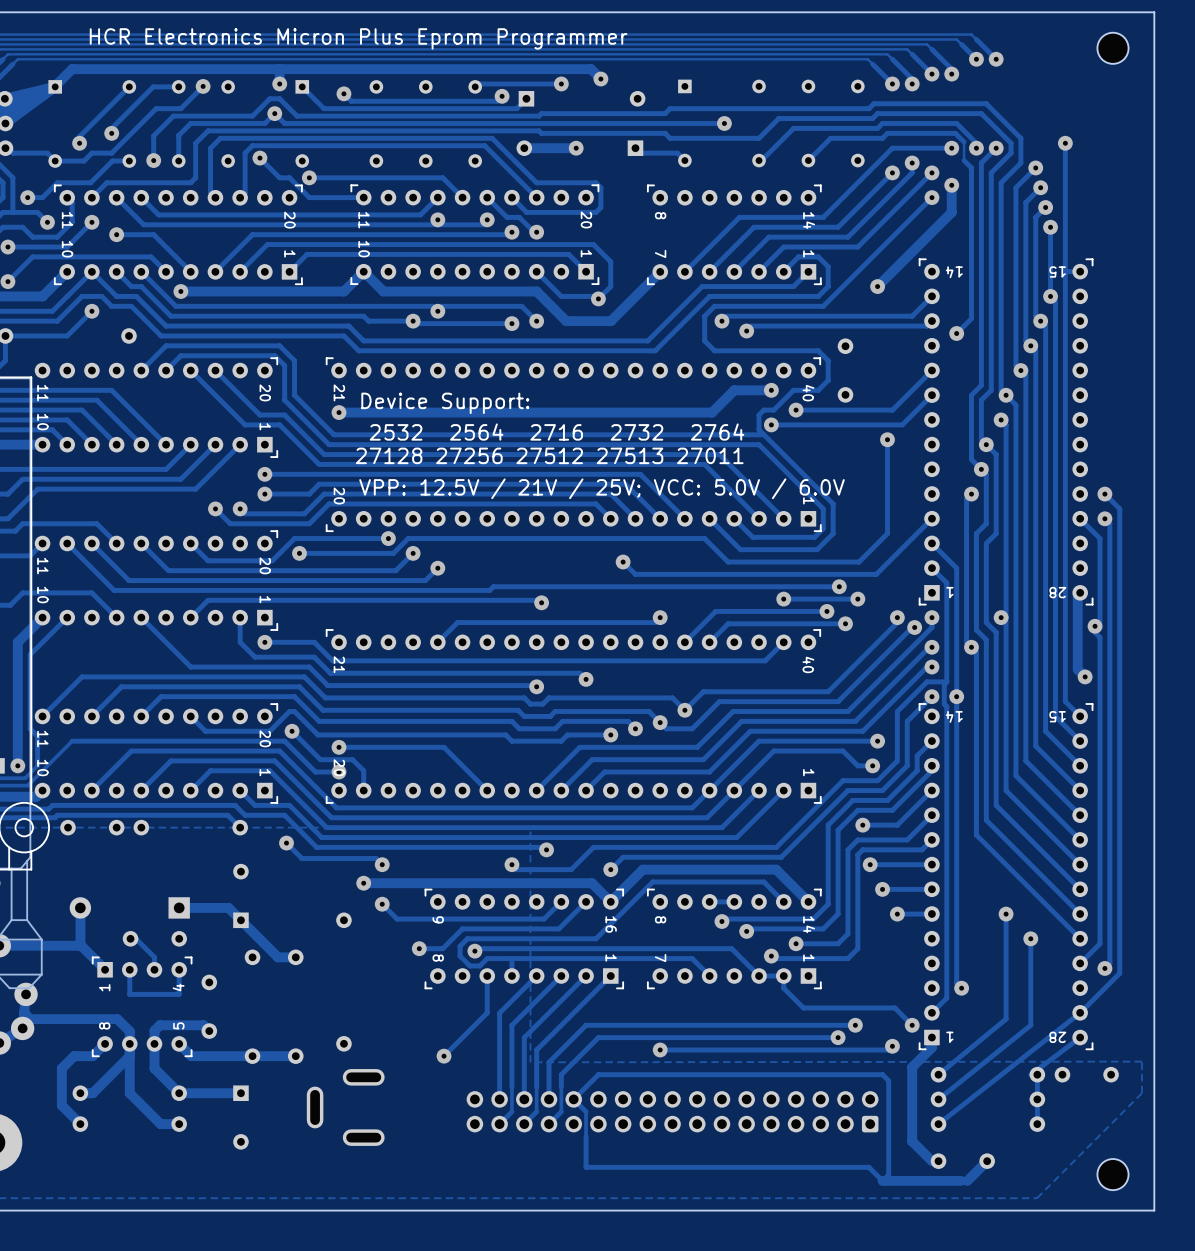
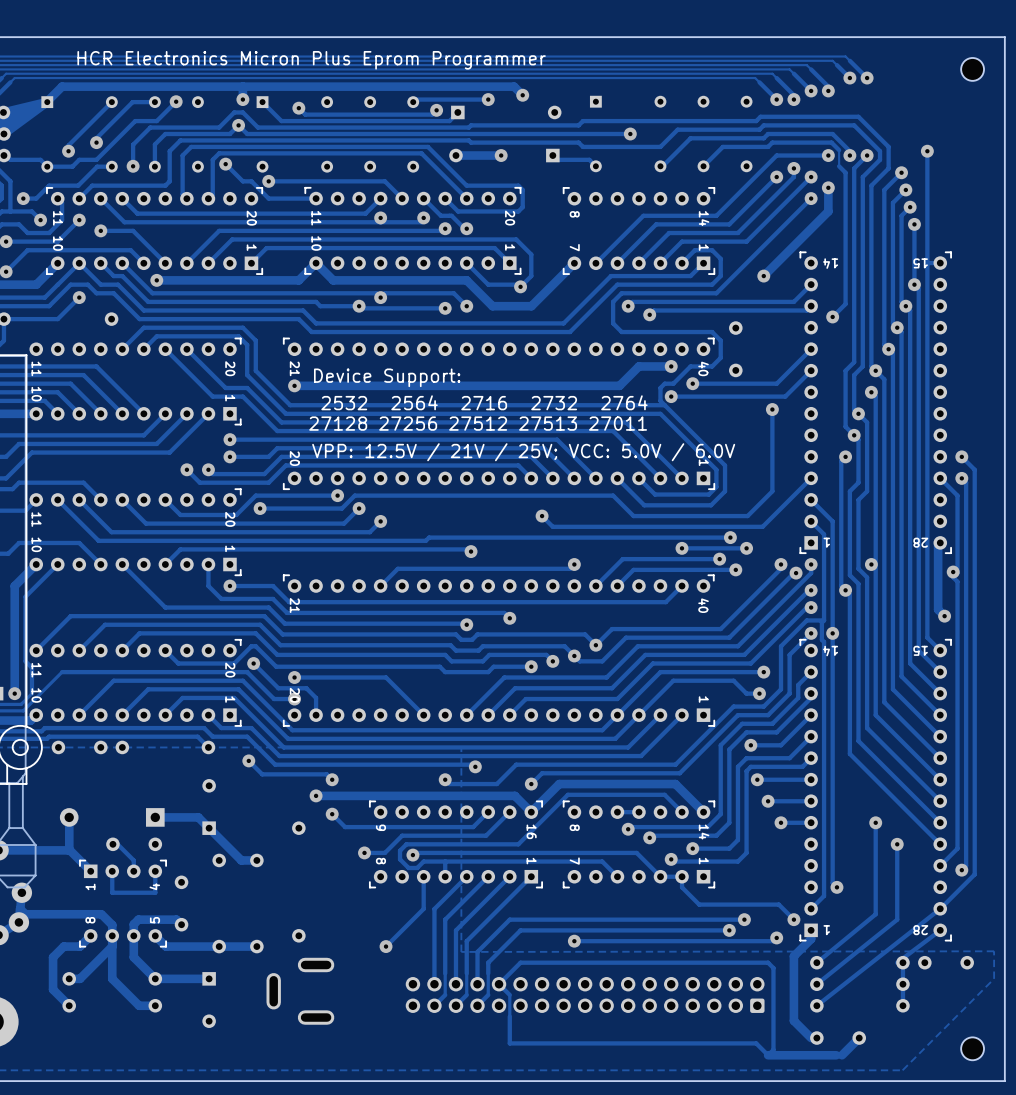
part footprint: [1097, 32, 1129, 64] -> [961, 57, 985, 81]
part footprint: [1097, 1159, 1129, 1191] -> [961, 1037, 985, 1061]

